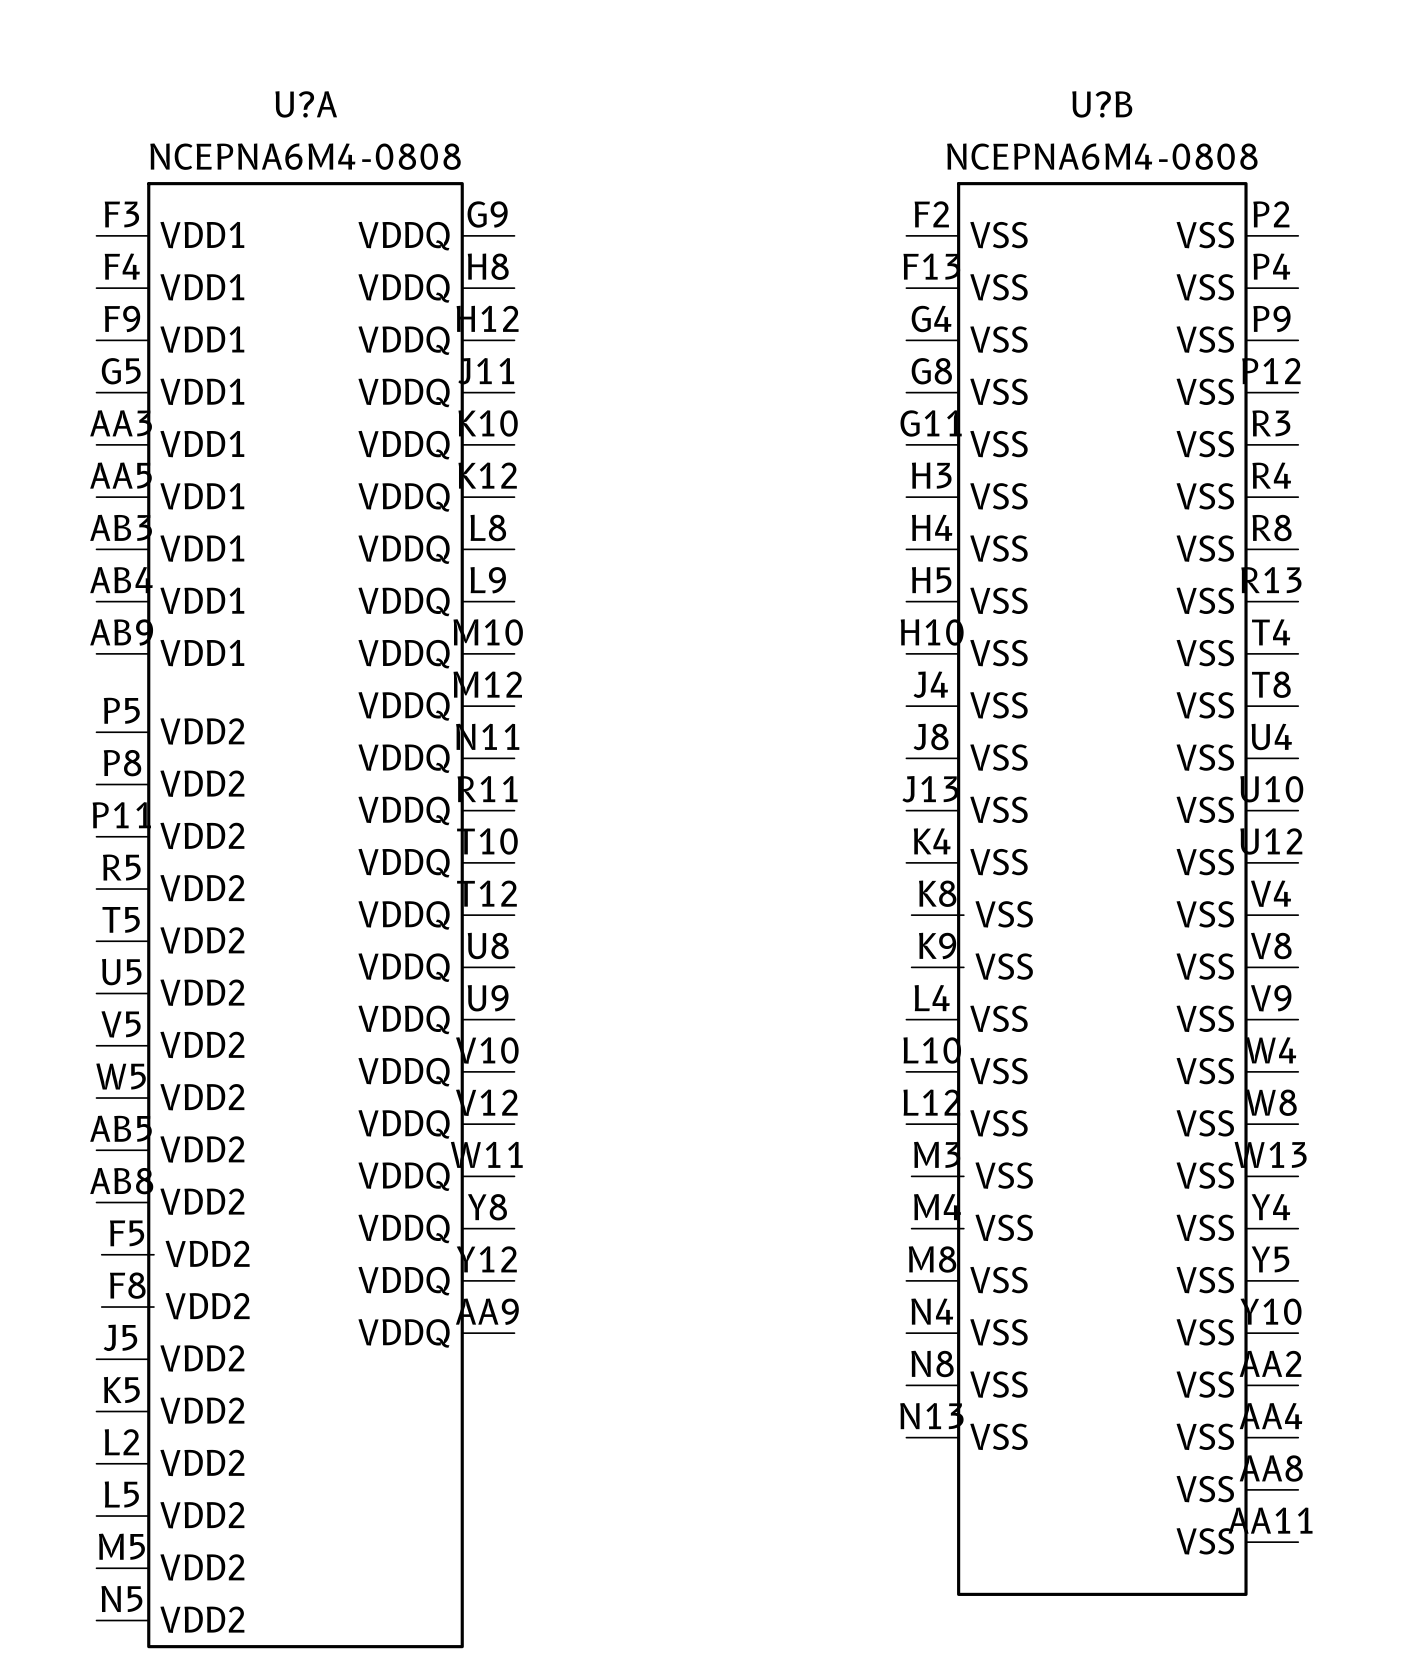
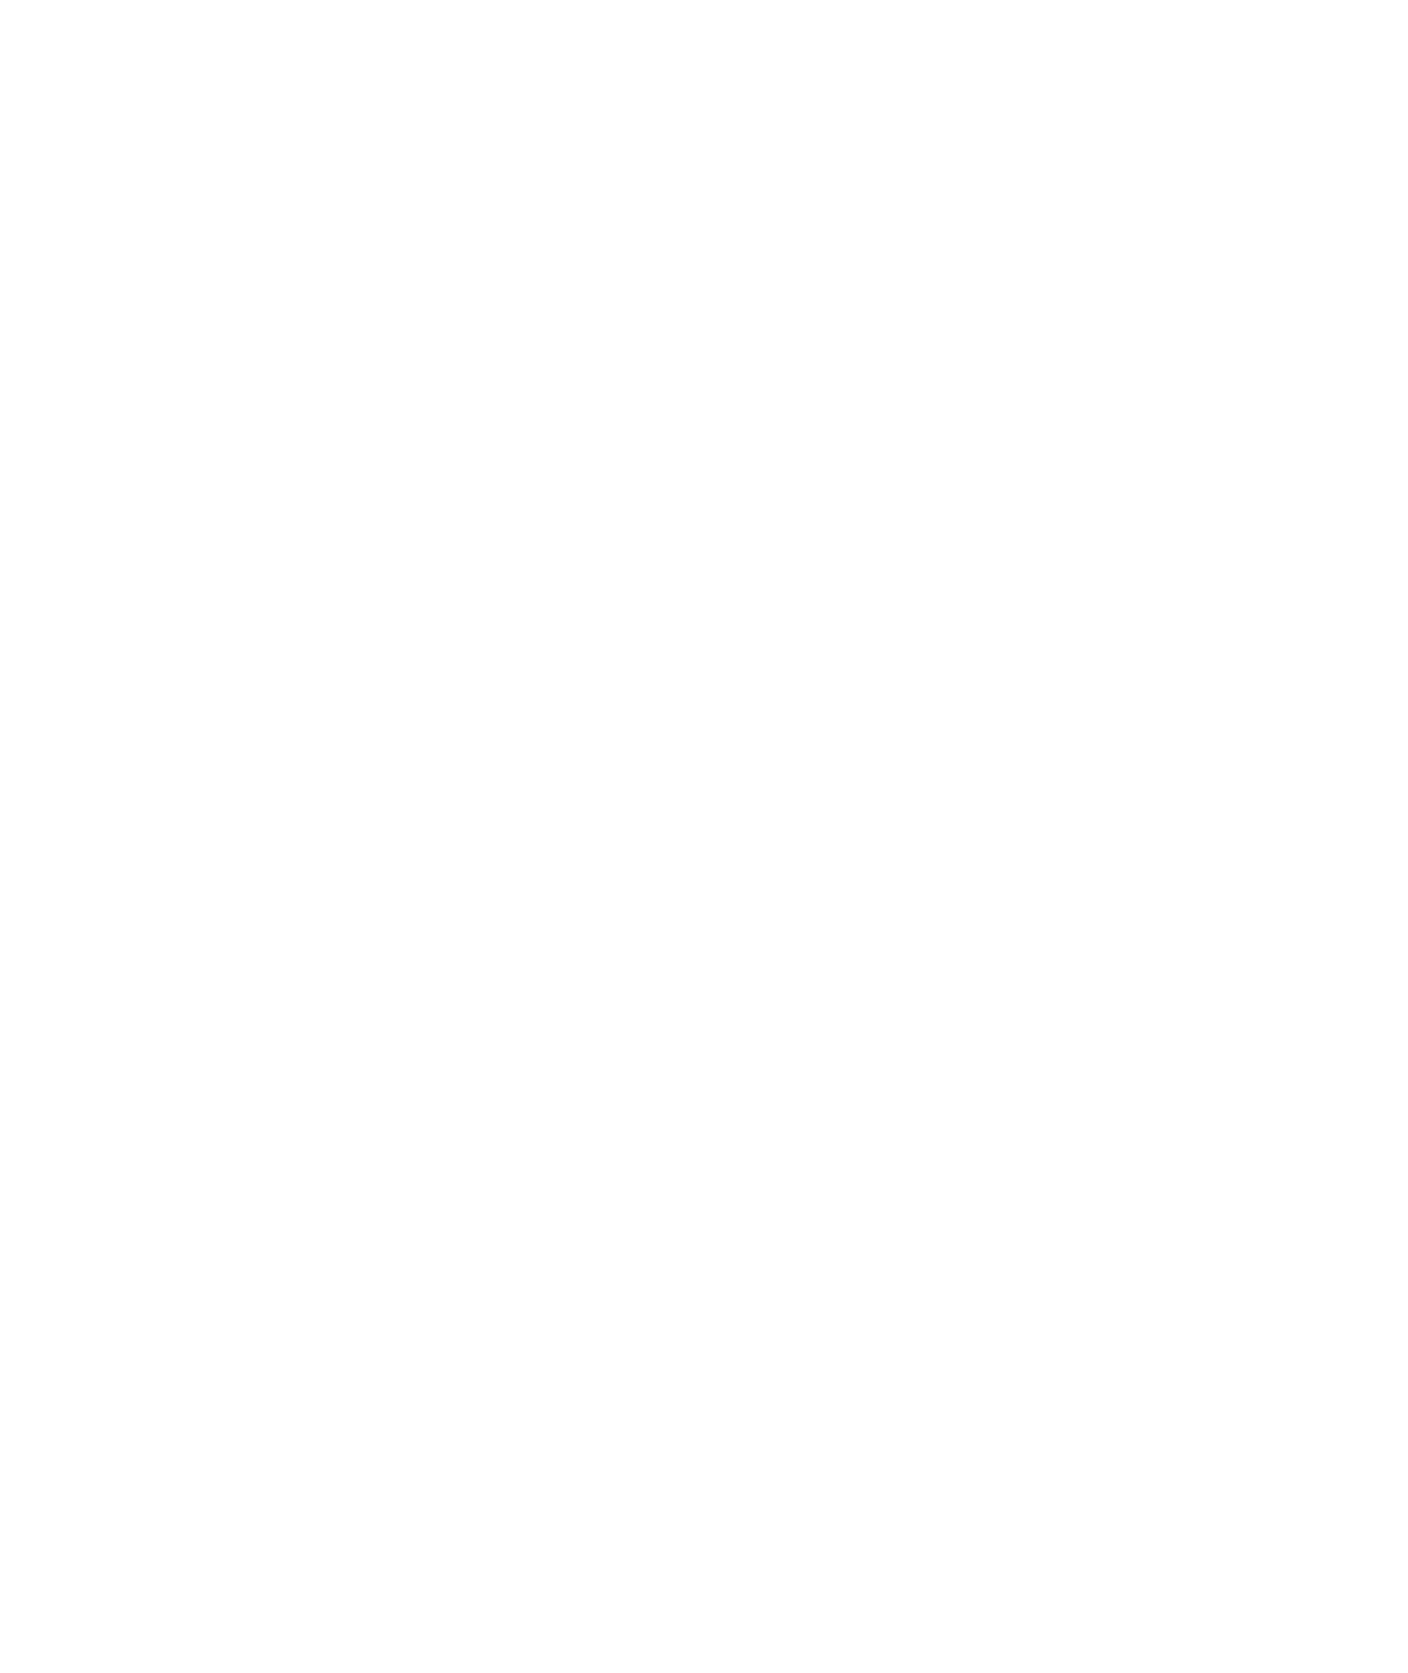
U?B: NCEPNA6M4-0808 (1102, 889) -> none
U?A: NCEPNA6M4-0808 (305, 915) -> none

